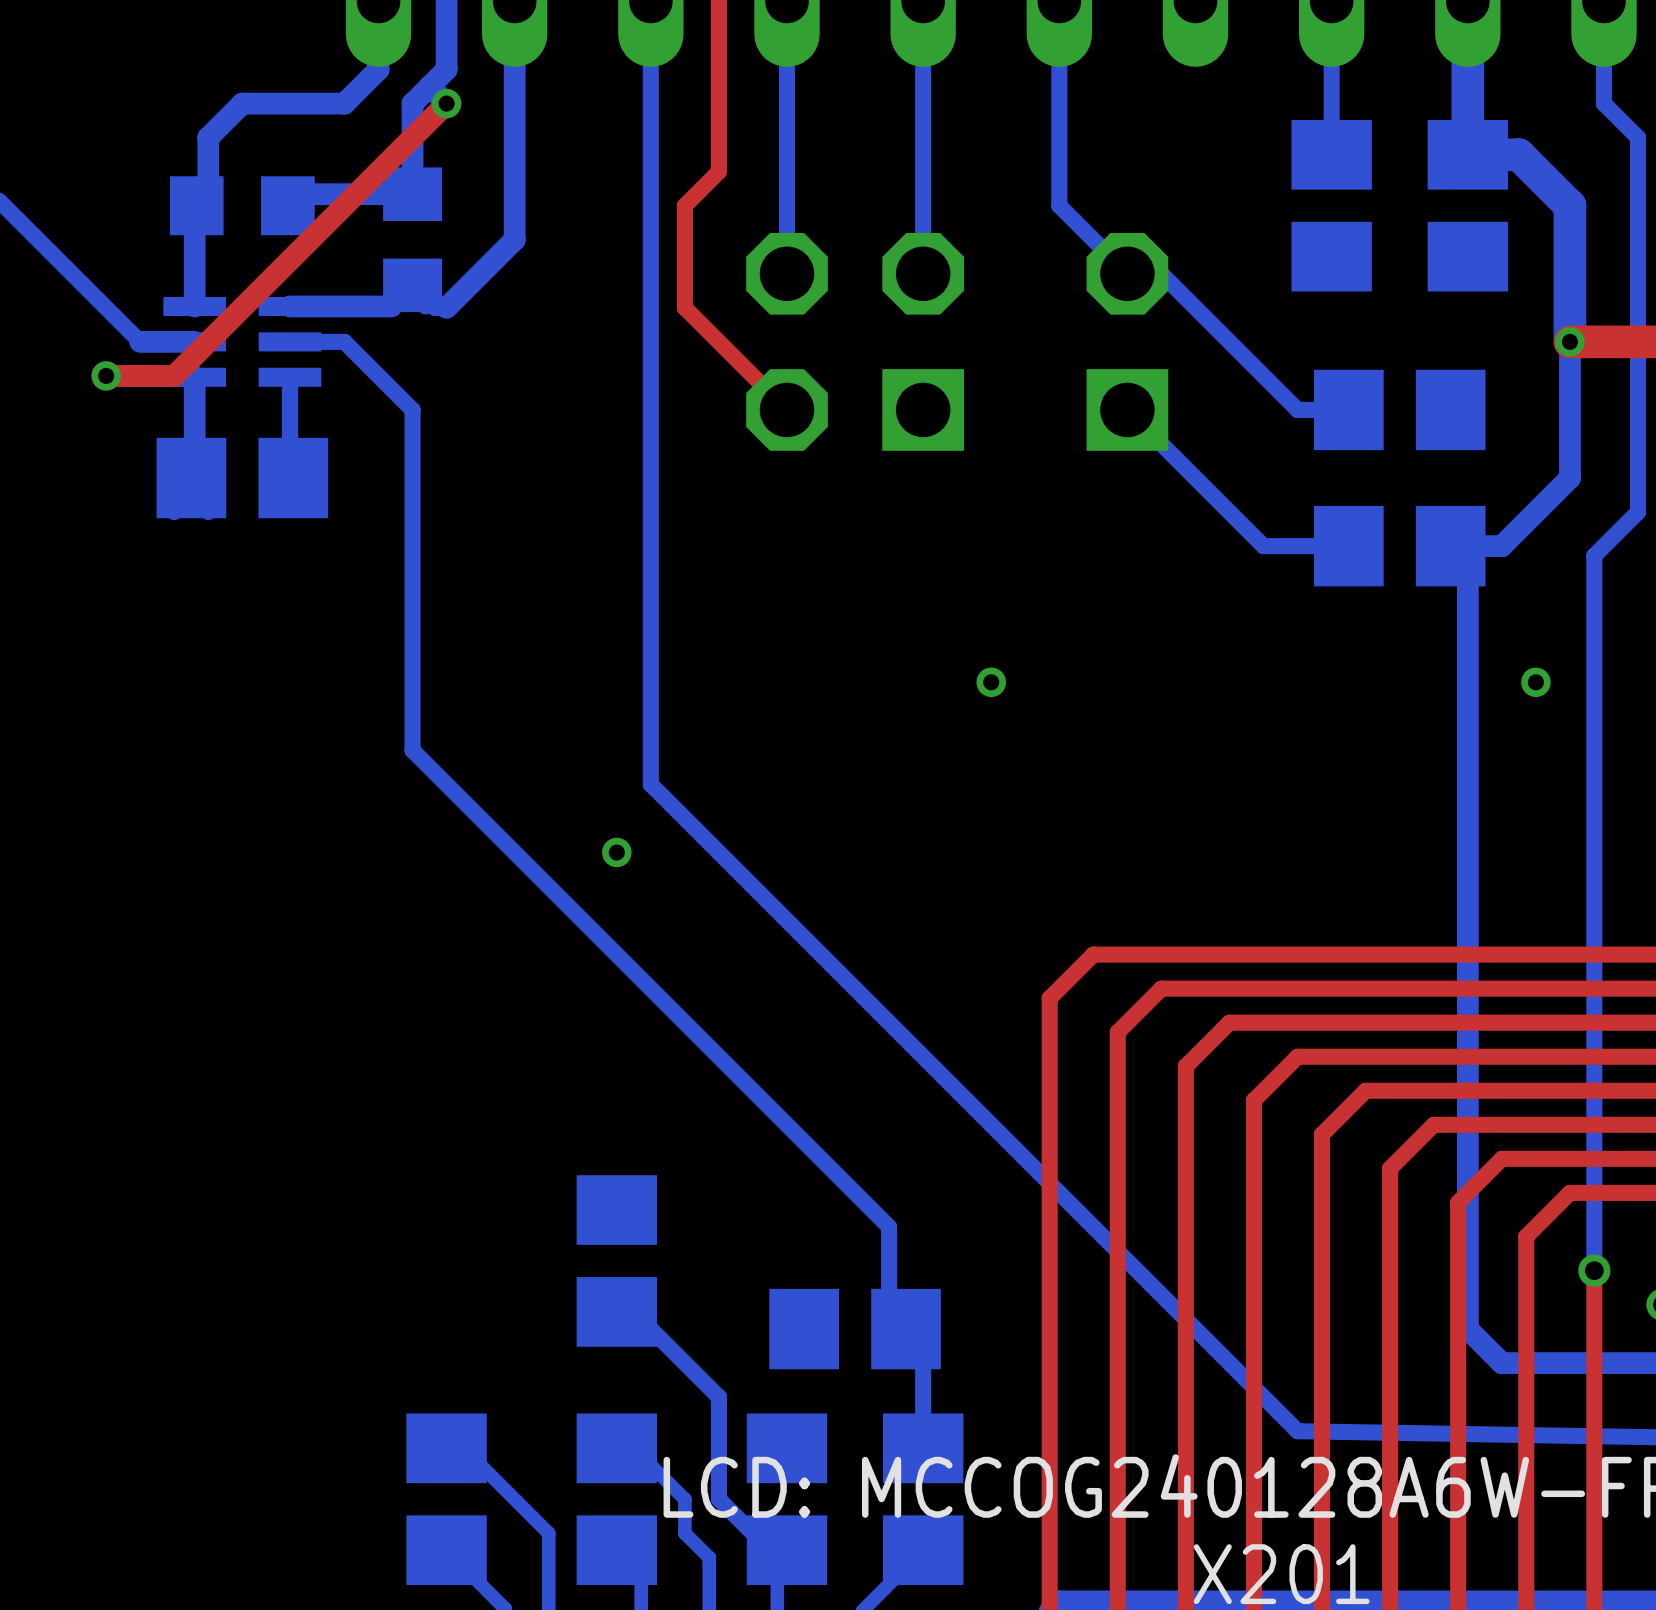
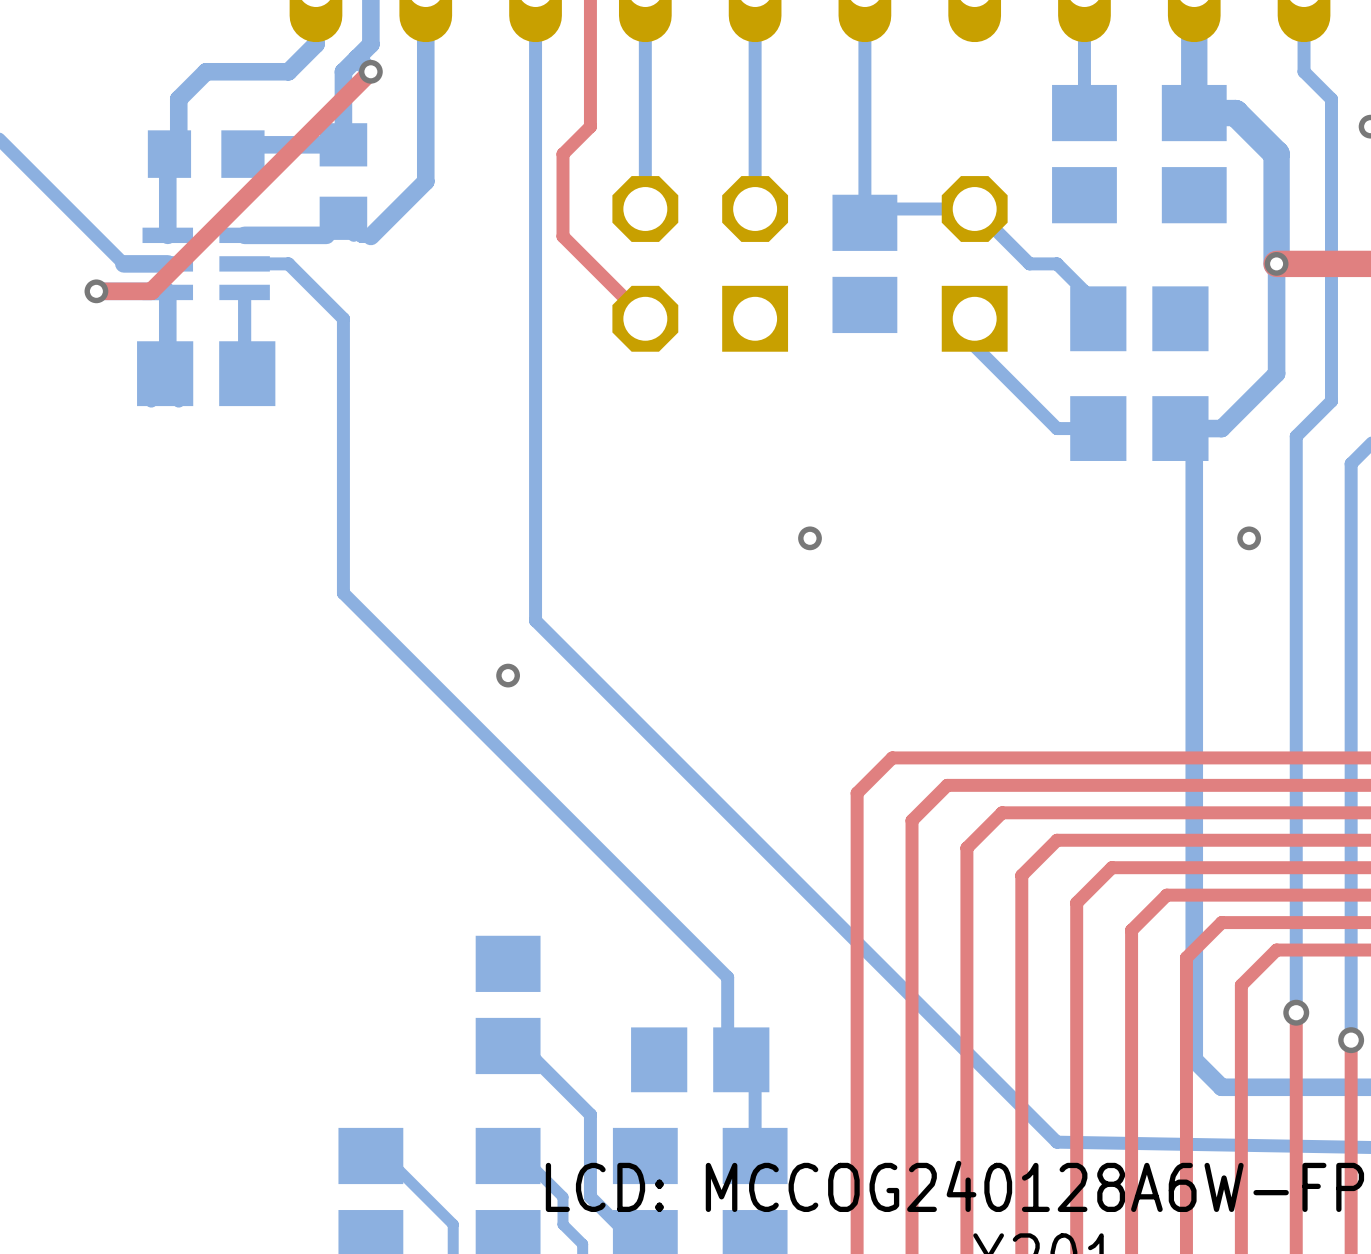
bottom track: (1059, 205) (1127, 273) -> (864, 154) (864, 209) (919, 209)
bottom track: (1161, 273) (1297, 409) (1348, 409) -> (947, 209) (974, 209) (1029, 263) (1057, 263) (1084, 291) (1098, 318)
part: none -> (864, 263)
part position: (1127, 341) -> (974, 263)
bottom track: (1127, 409) (1263, 546) (1297, 546) -> (974, 318) (974, 346) (1057, 428)

